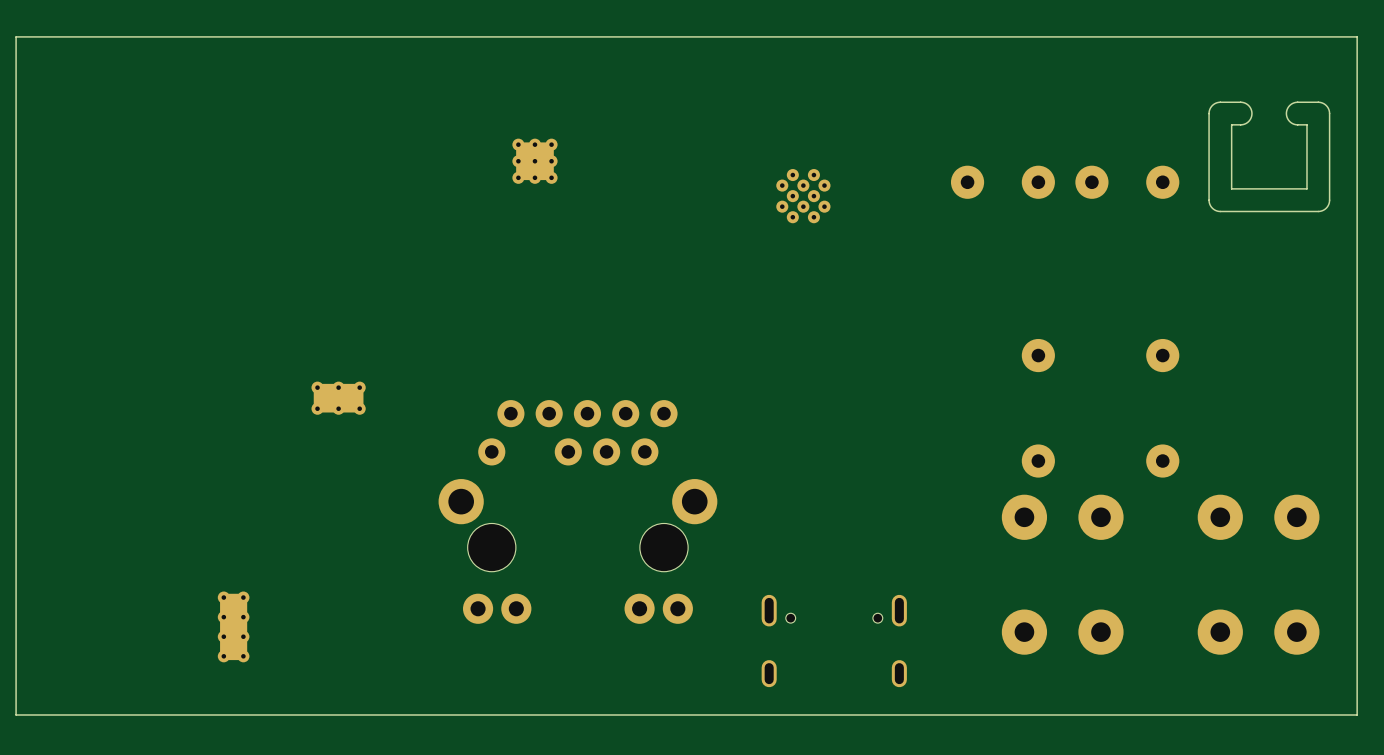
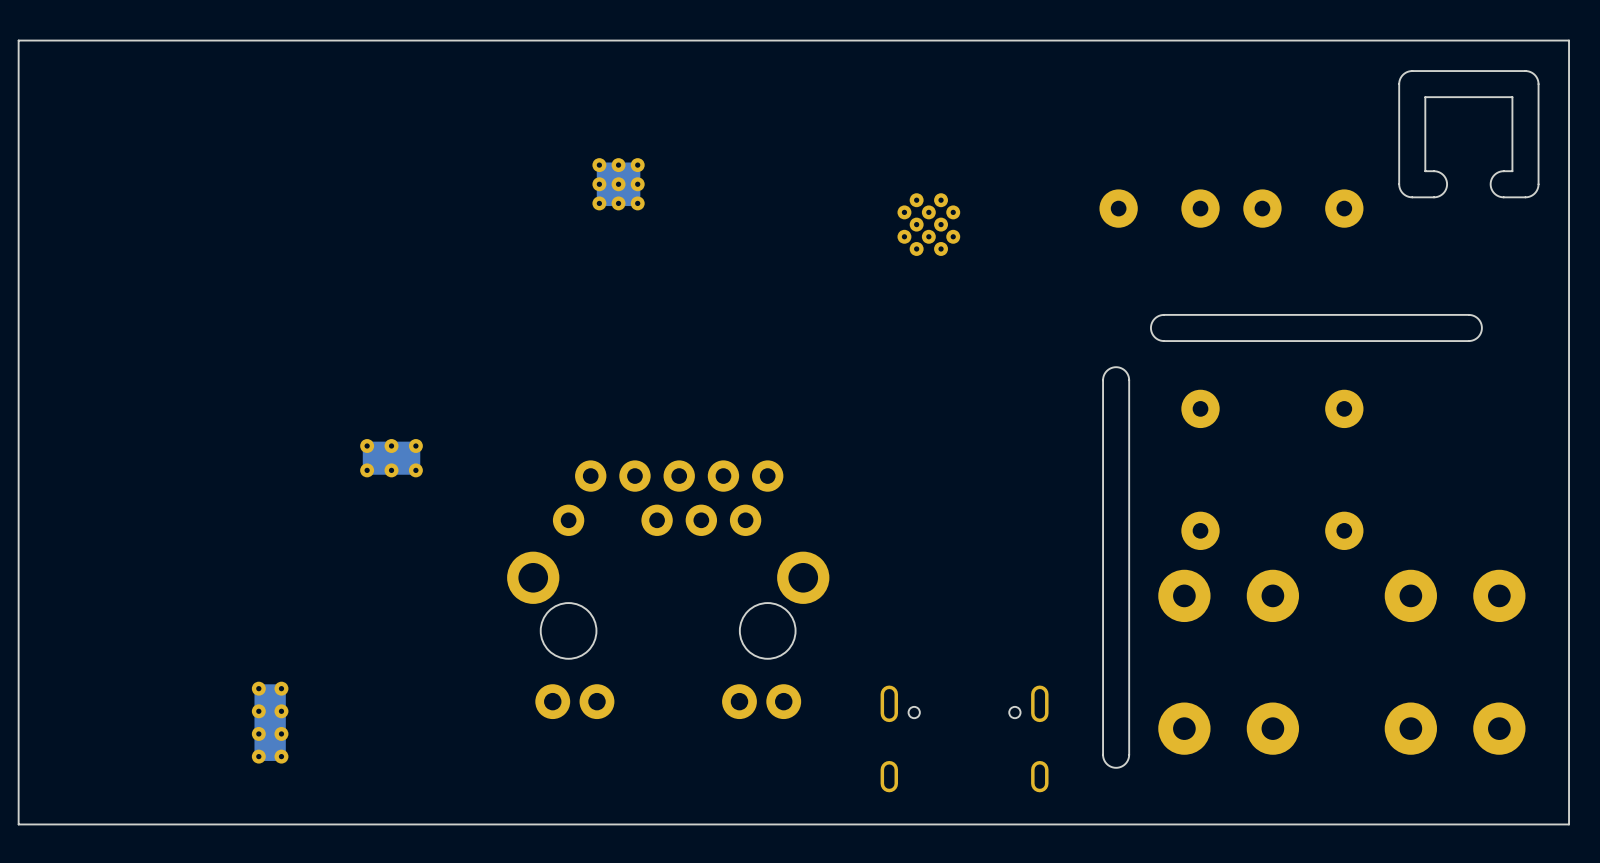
board edge: none -> (1525, 71) (1412, 71) (1403, 74) (1399, 84) (1399, 184) (1403, 193) (1410, 197) (1435, 197) (1443, 193) (1446, 187) (1446, 180) (1441, 173) (1435, 171) (1425, 171) (1425, 97) (1512, 97) (1512, 171) (1502, 171) (1495, 173) (1491, 180) (1491, 187) (1494, 193) (1502, 197) (1527, 197) (1534, 193) (1538, 184) (1538, 82) (1534, 74) (1525, 71)
board edge: (1318, 102) (1293, 102) (1288, 107) (1286, 112) (1287, 118) (1291, 122) (1306, 124) (1306, 188) (1231, 188) (1231, 124) (1247, 122) (1251, 117) (1251, 110) (1248, 105) (1242, 102) (1218, 102) (1212, 105) (1209, 113) (1209, 200) (1212, 208) (1220, 211) (1318, 211) (1326, 208) (1329, 200) (1329, 112) (1326, 105) (1318, 102) -> none
board edge: none -> (1468, 314) (1164, 314) (1154, 318) (1150, 327) (1154, 337) (1164, 341) (1468, 341) (1478, 337) (1481, 327) (1478, 318) (1468, 314)
board edge: none -> (1129, 380) (1129, 754) (1125, 764) (1116, 767) (1106, 764) (1103, 754) (1103, 380) (1106, 371) (1116, 367) (1125, 371) (1129, 380)

